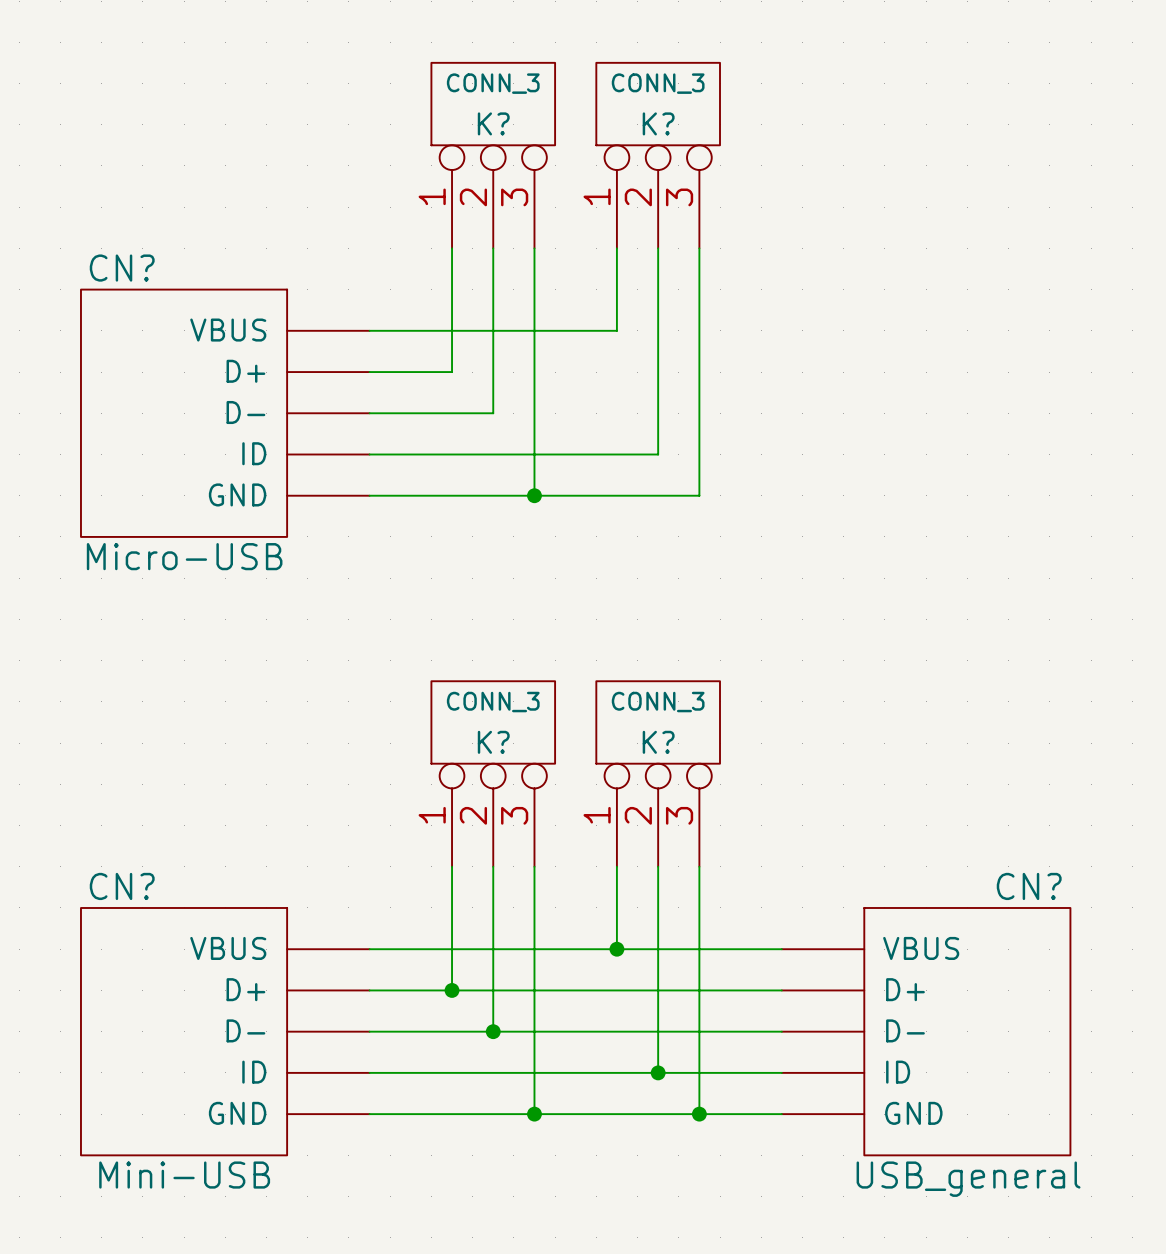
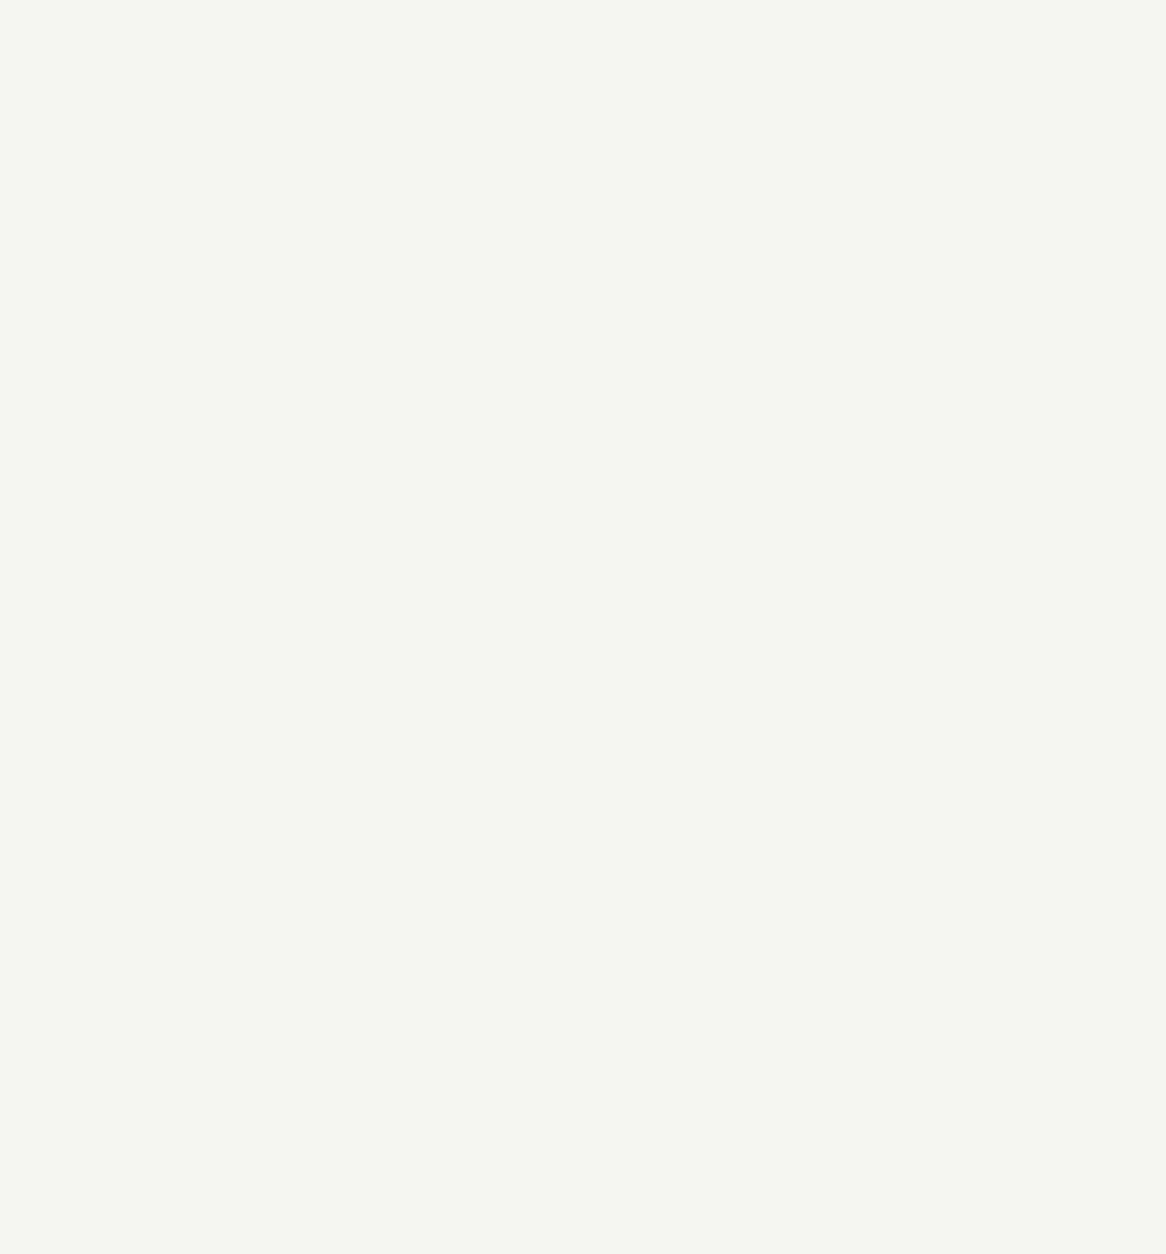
K?: CONN_3 (493, 155) -> none
K?: CONN_3 (658, 155) -> none
wire: (452, 248) (452, 372) (369, 372) -> none
wire: (493, 248) (493, 413) (369, 413) -> none
wire: (534, 248) (534, 495) -> none
wire: (616, 248) (616, 330) (369, 330) -> none
wire: (658, 248) (658, 454) (369, 454) -> none
wire: (699, 248) (699, 495) (369, 495) -> none
CN?: Micro-USB (225, 413) -> none
junction: (534, 495) -> none
K?: CONN_3 (493, 774) -> none
K?: CONN_3 (658, 774) -> none
wire: (452, 866) (452, 990) -> none
wire: (493, 866) (493, 1031) -> none
wire: (534, 866) (534, 1114) -> none
wire: (616, 866) (616, 949) -> none
wire: (658, 866) (658, 1072) -> none
wire: (699, 866) (699, 1114) -> none
wire: (369, 949) (781, 949) -> none
junction: (616, 949) -> none
wire: (369, 990) (781, 990) -> none
junction: (452, 990) -> none
CN?: Mini-USB (225, 1031) -> none
wire: (369, 1031) (781, 1031) -> none
junction: (493, 1031) -> none
CN?: USB_general (926, 1031) -> none
wire: (369, 1072) (781, 1072) -> none
junction: (658, 1072) -> none
wire: (369, 1114) (781, 1114) -> none
junction: (534, 1114) -> none
junction: (699, 1114) -> none

